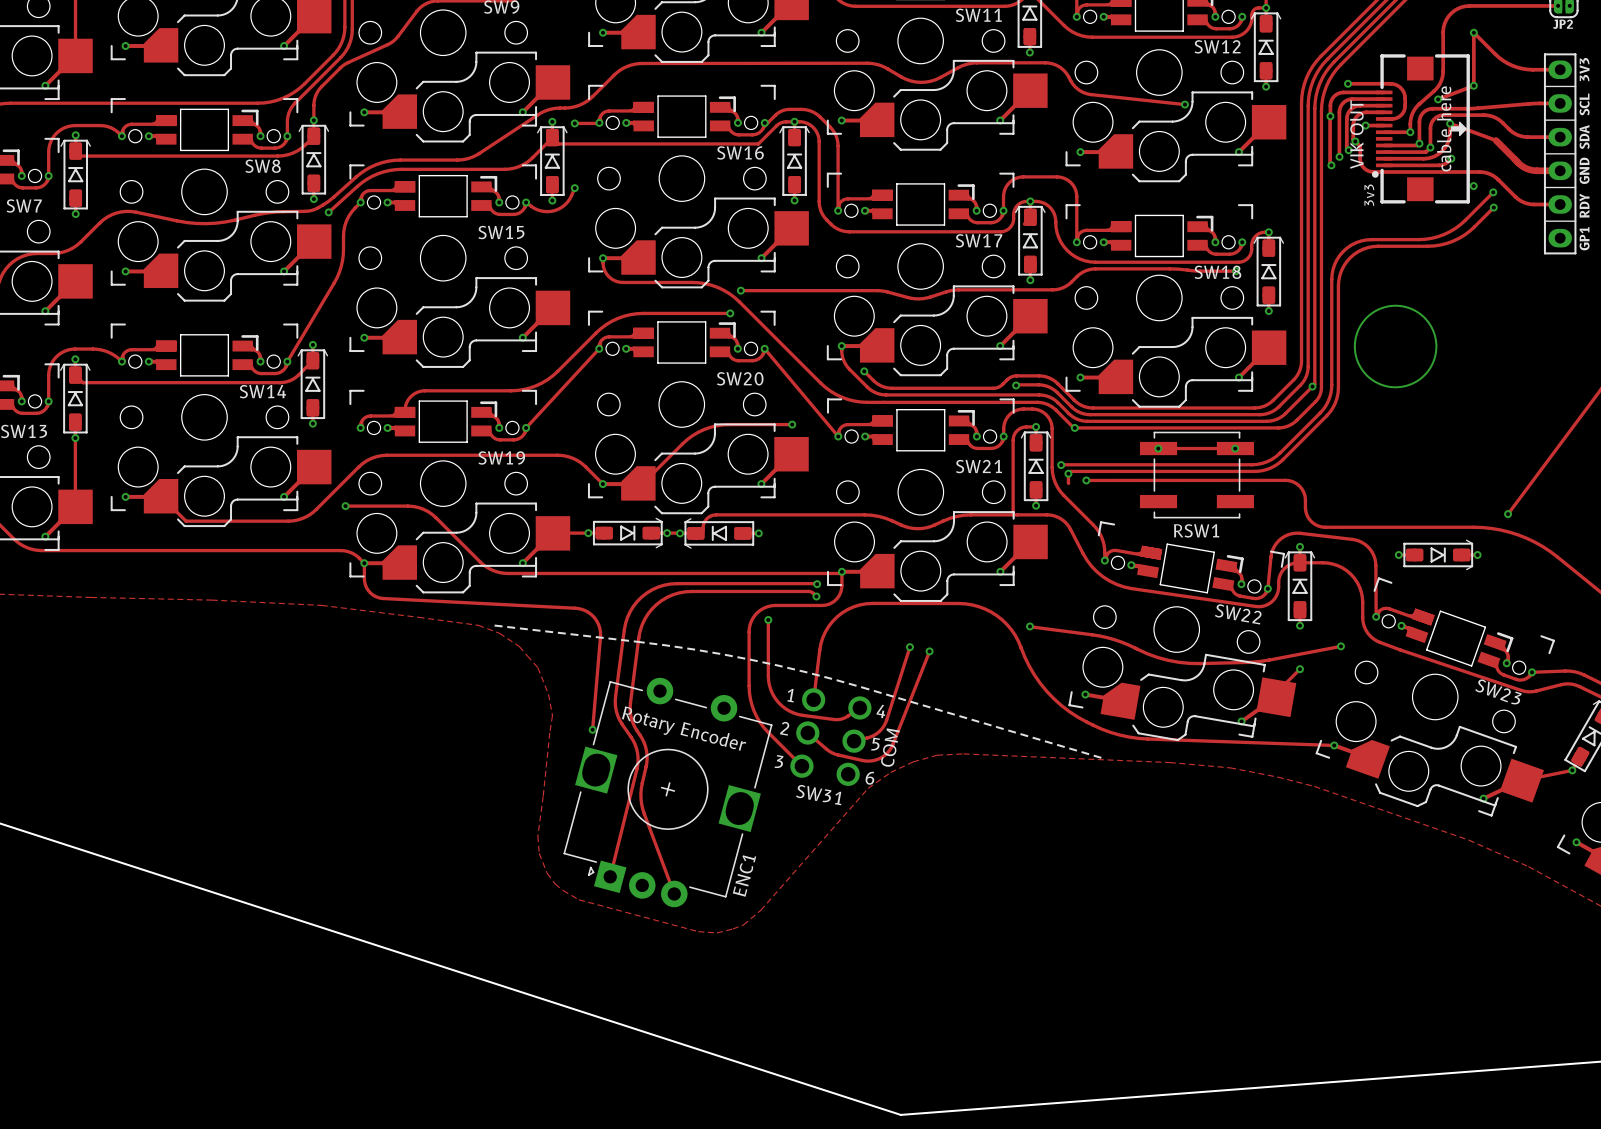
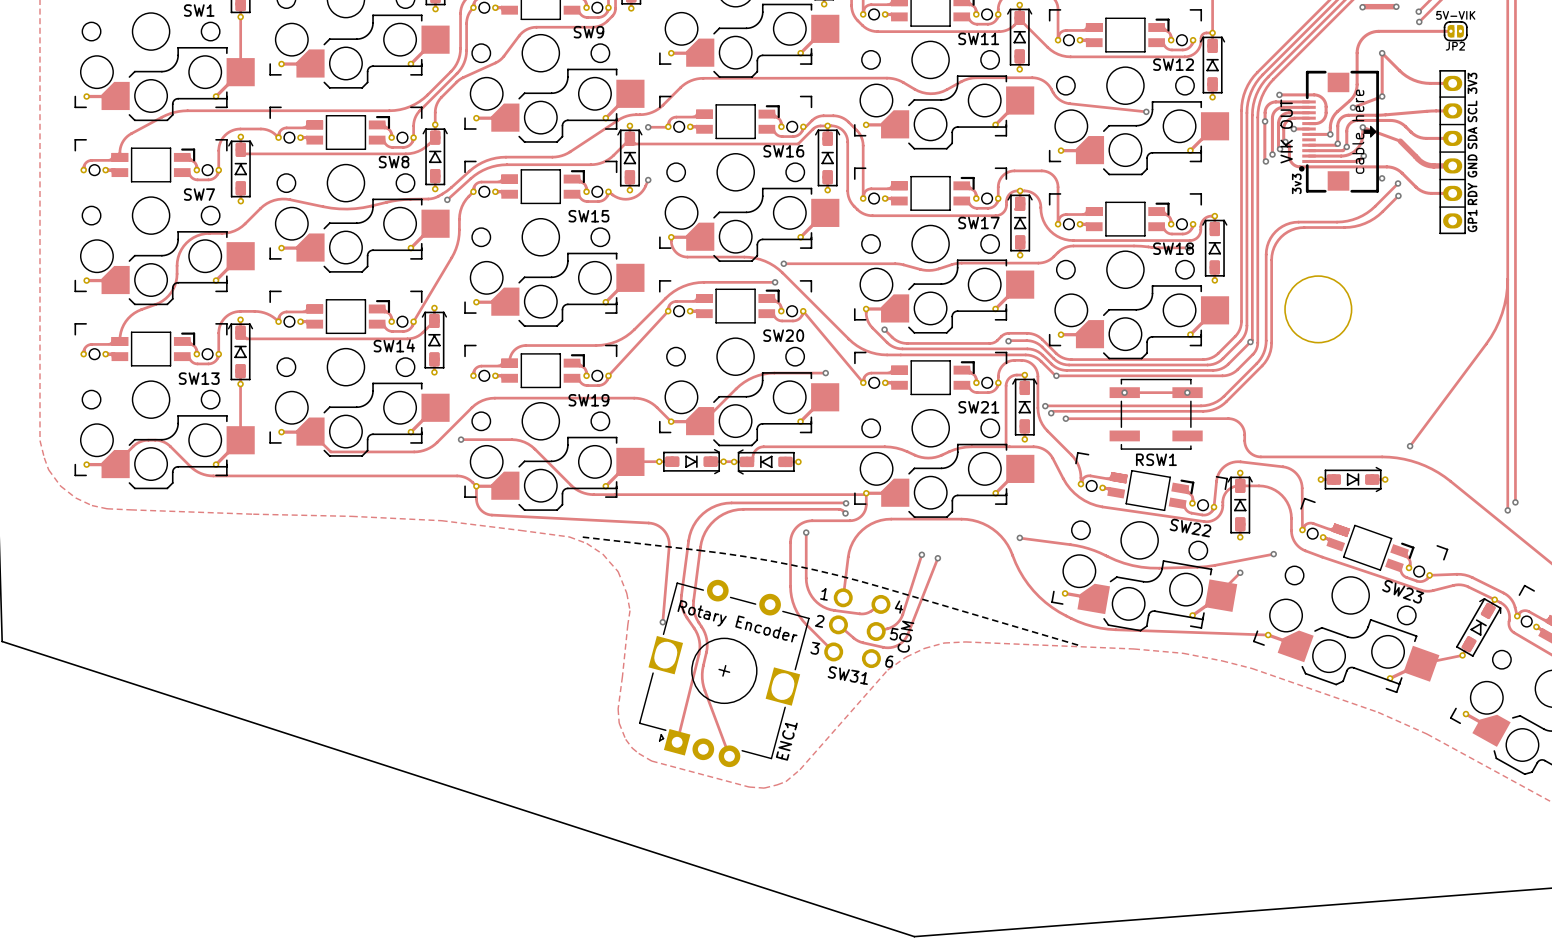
track: (1068, 473) (1068, 483) -> none

